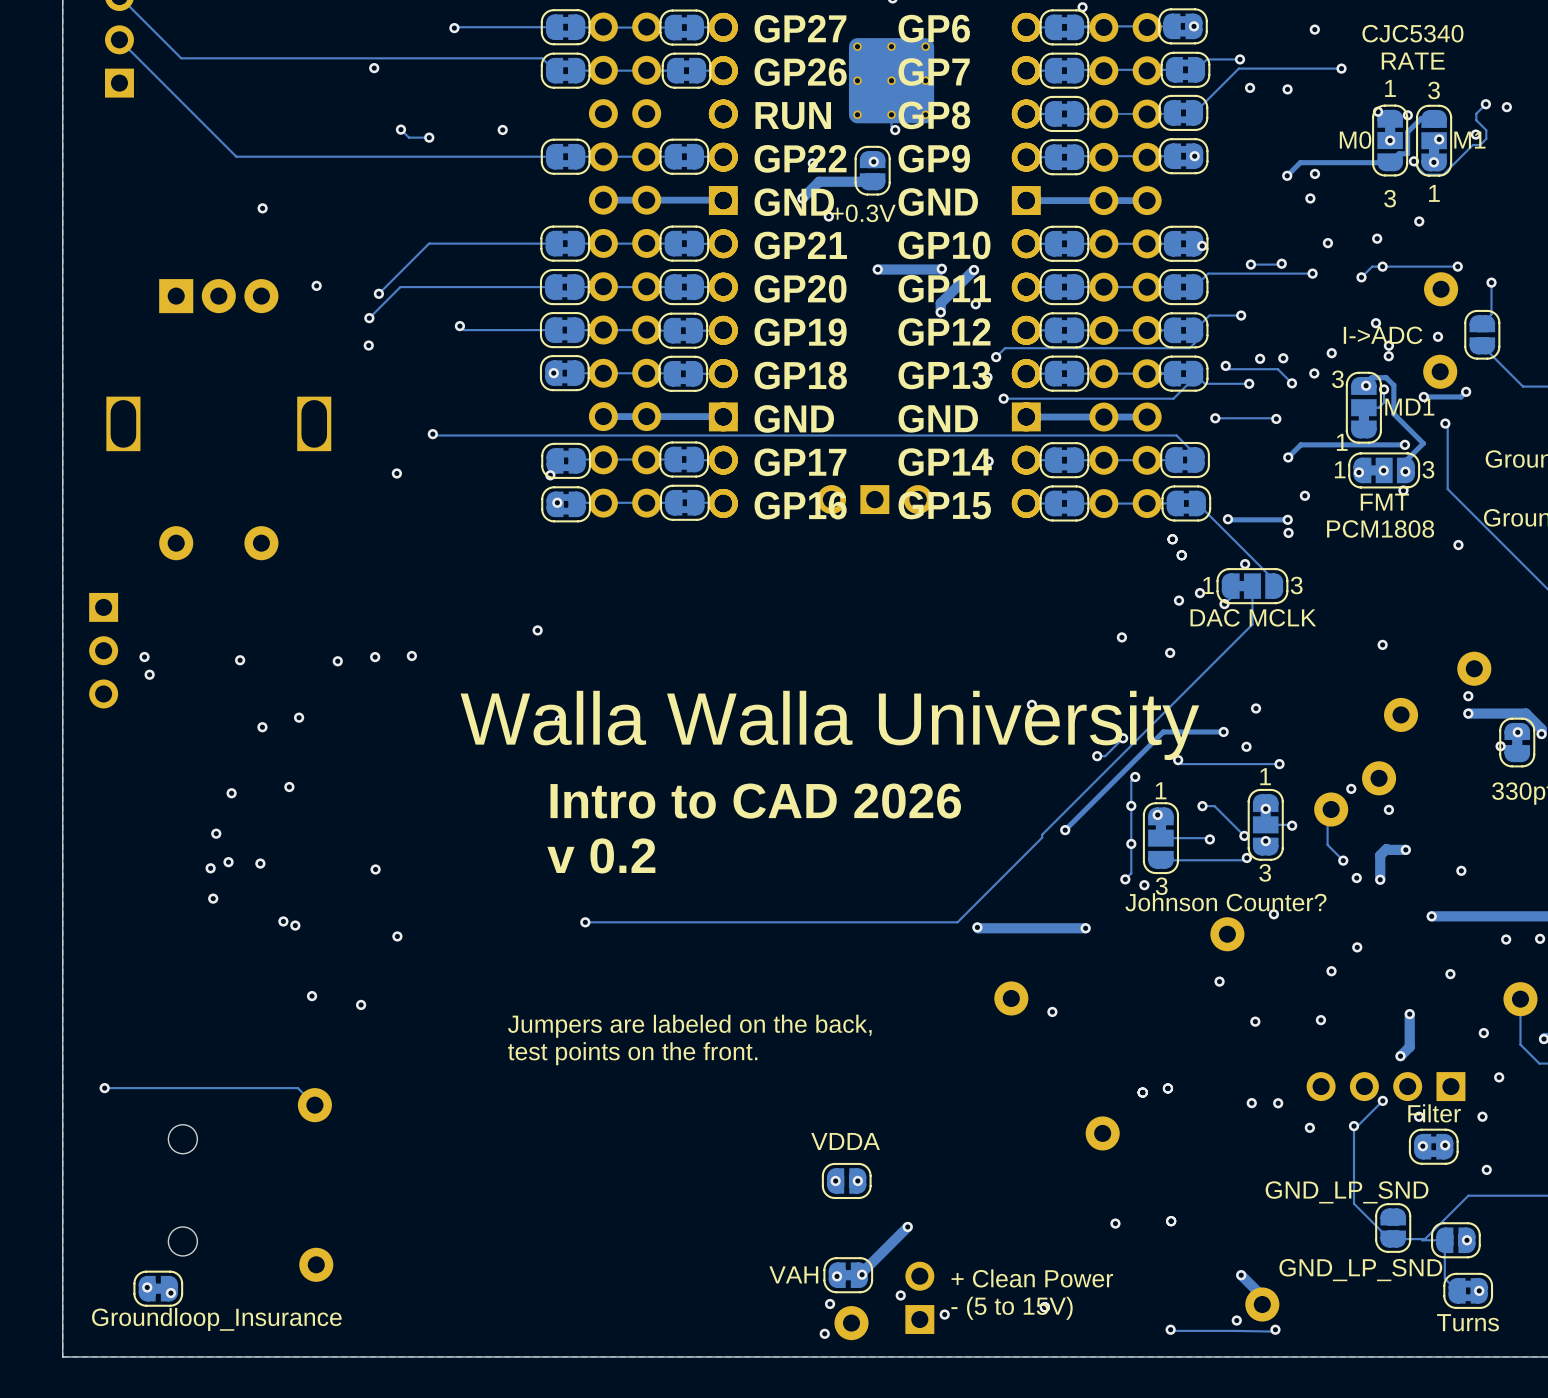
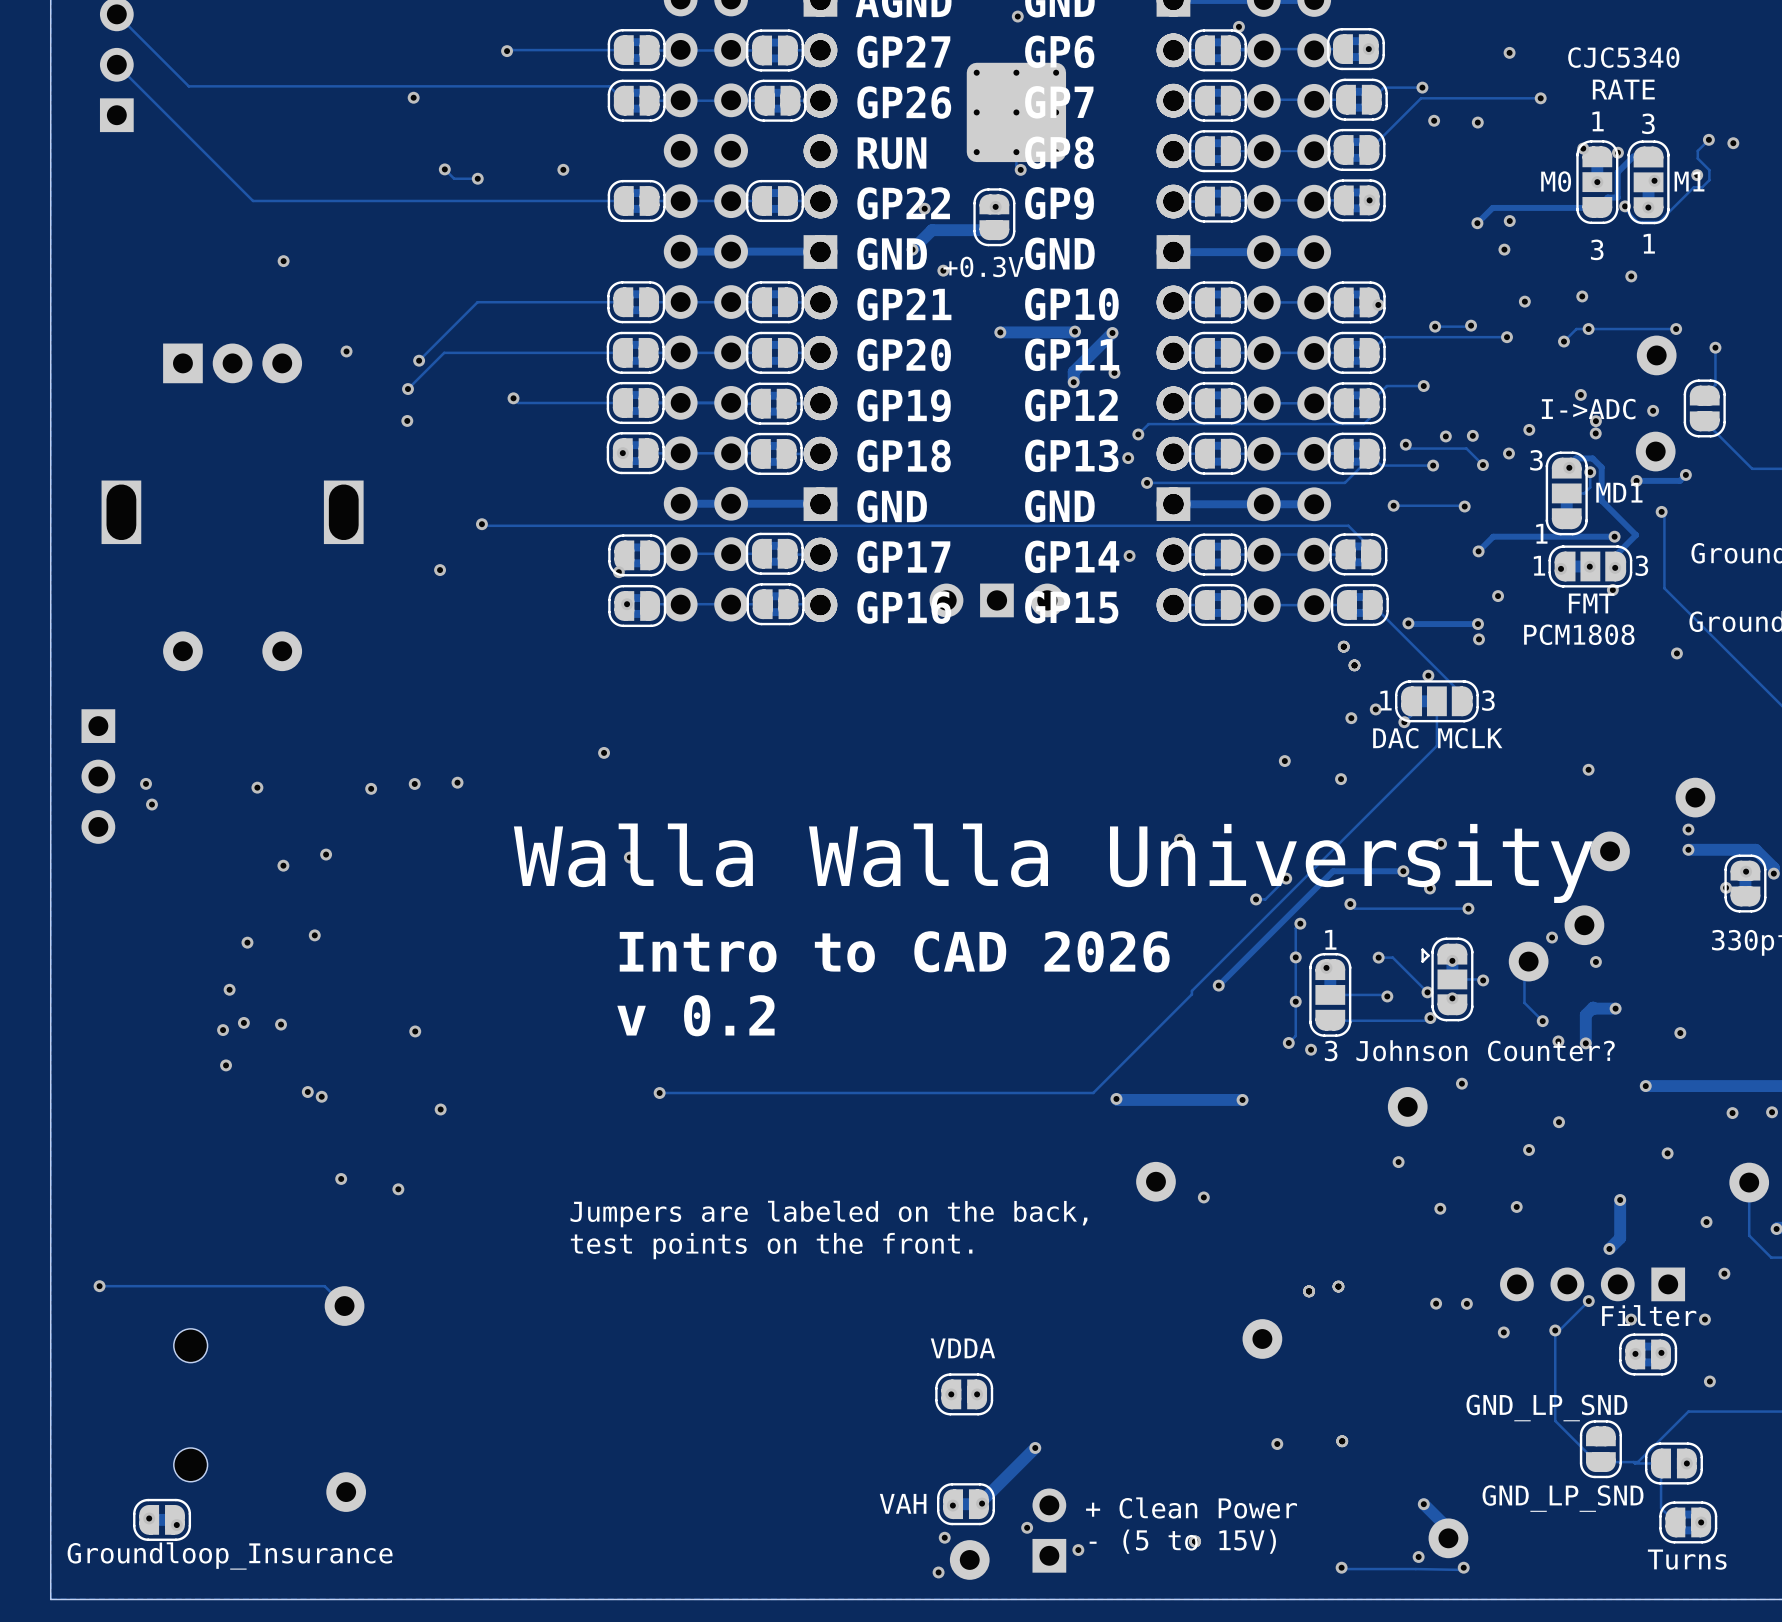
part footprint: [1247, 788, 1284, 861] -> [1421, 937, 1474, 1022]
part value position: Johnson Counter? (1225, 902) -> Johnson Counter? (1485, 1050)

